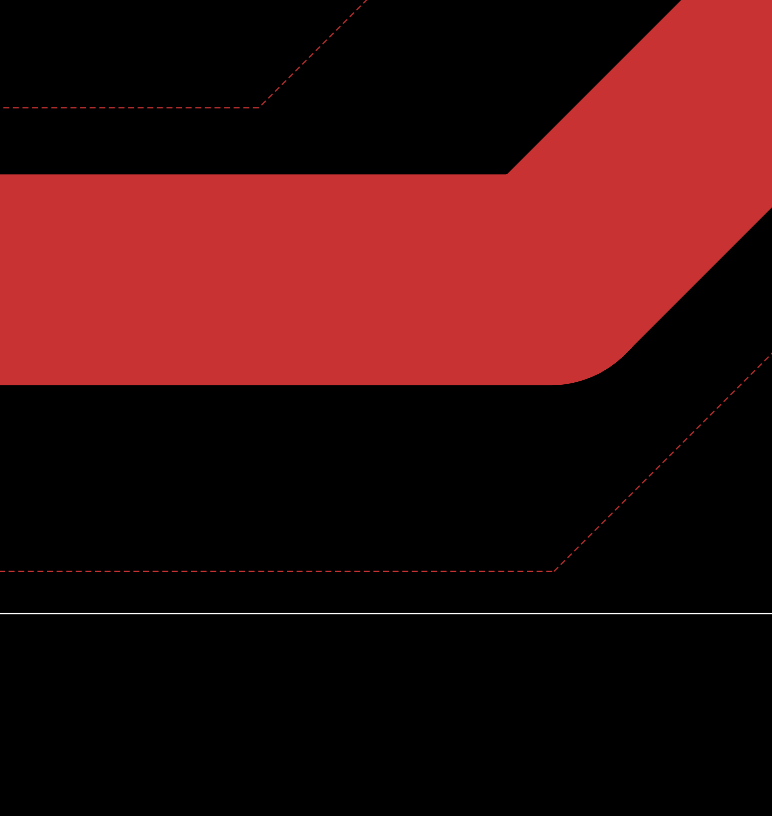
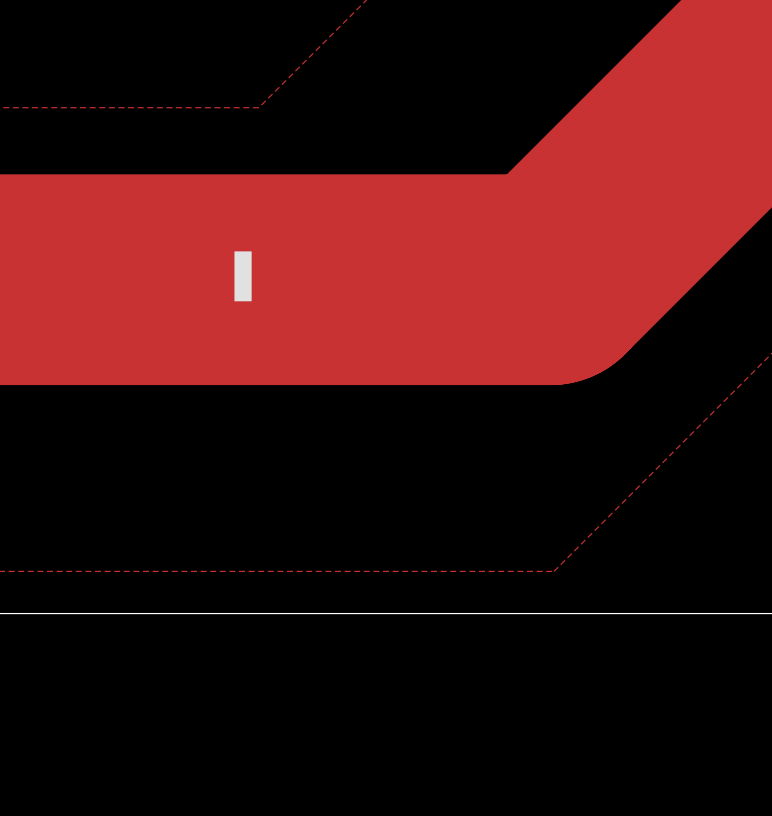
text: none -> - (243, 276)

